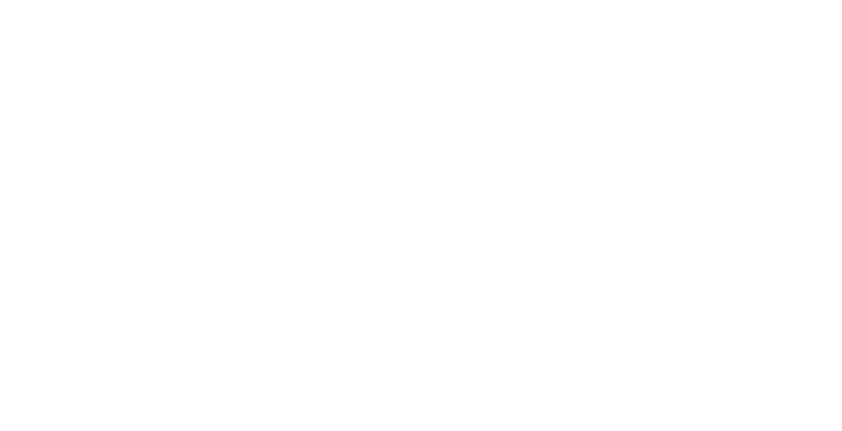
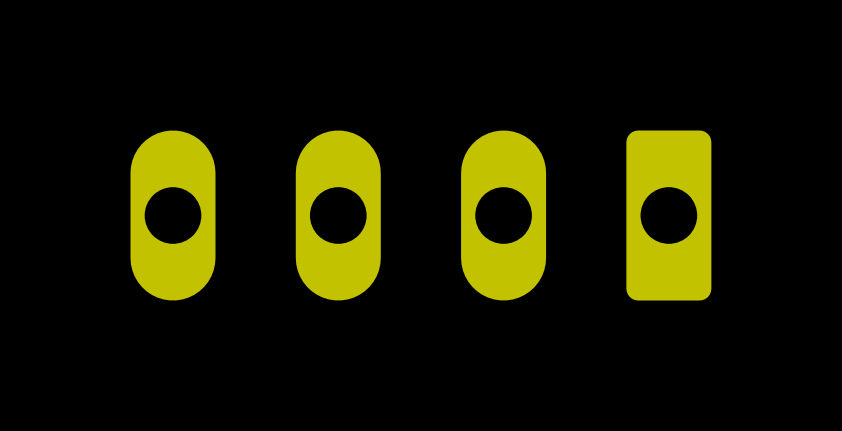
part: none -> (420, 215)

